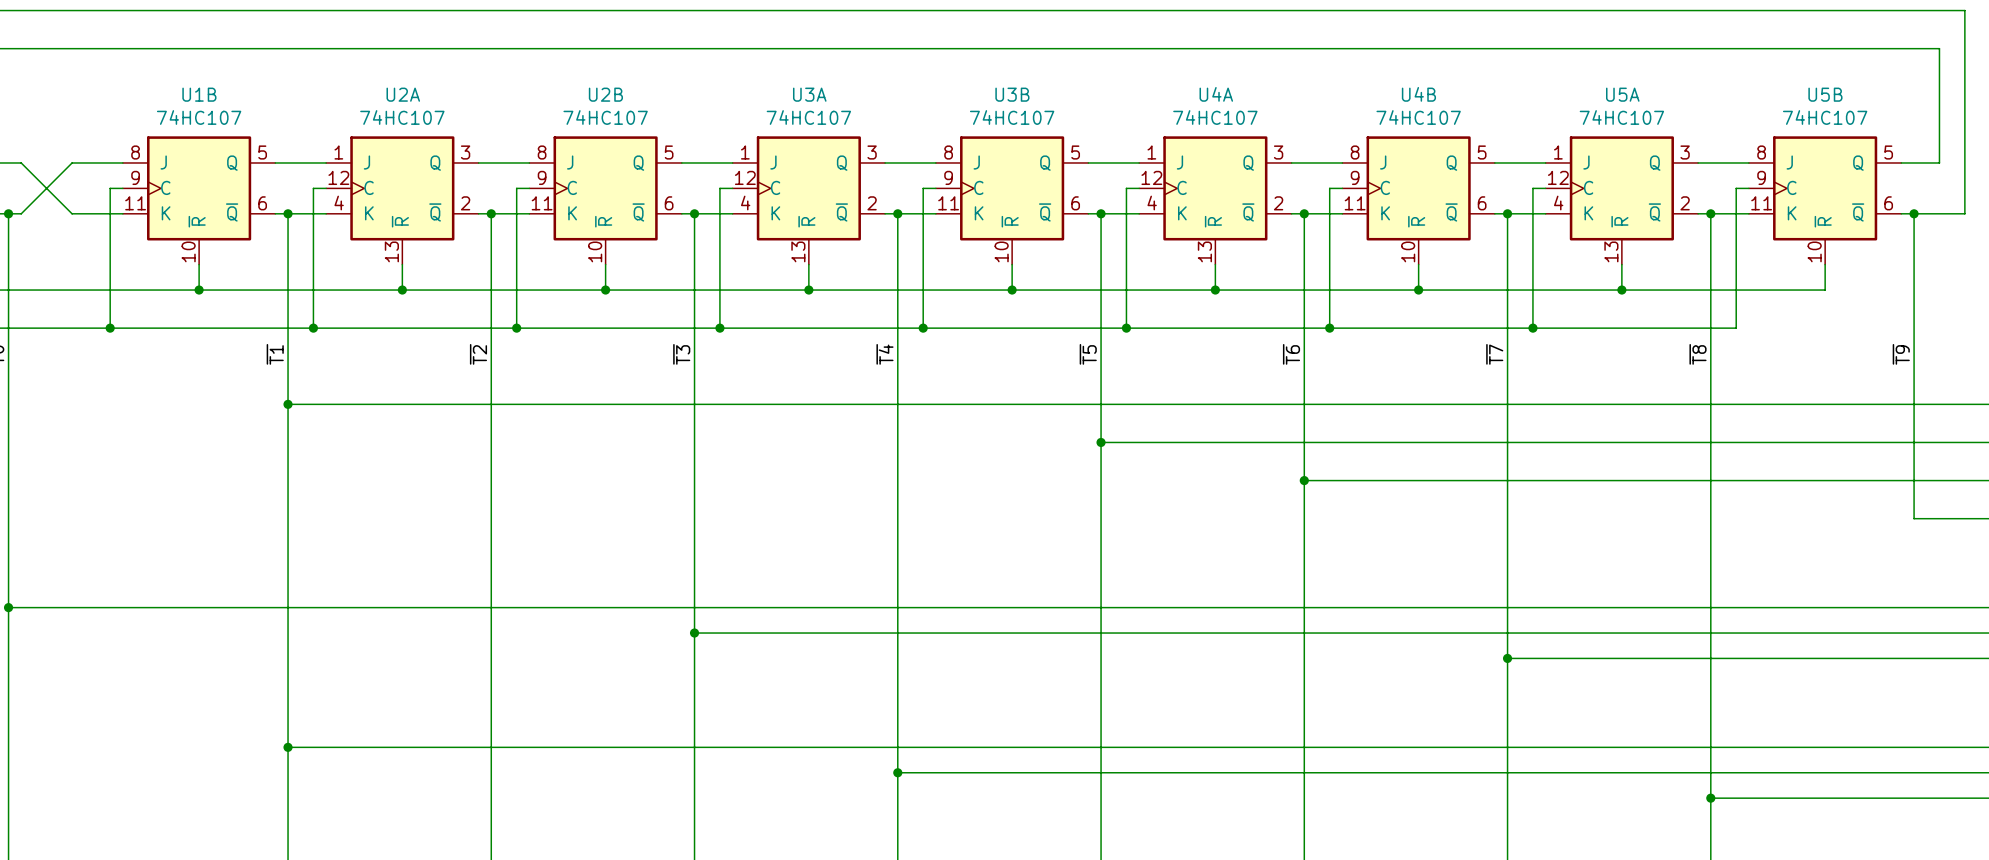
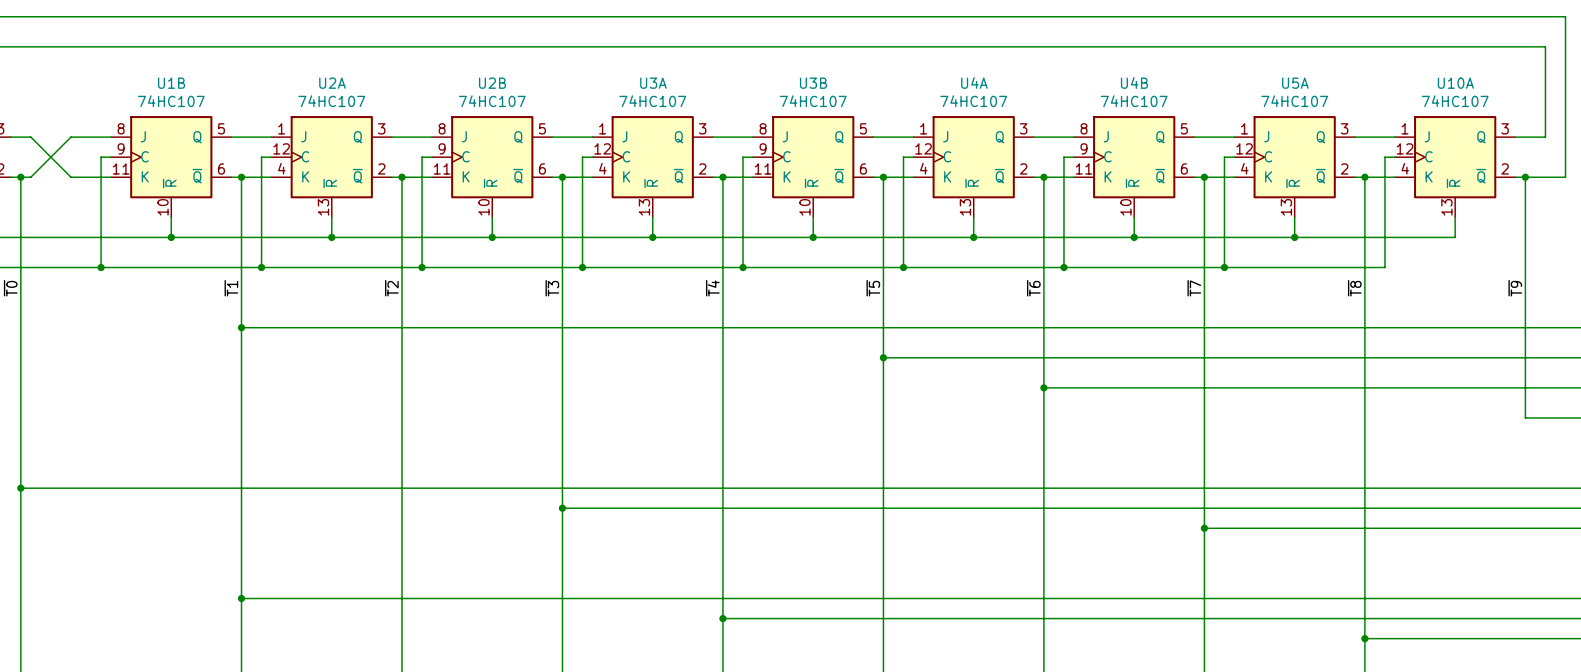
U5B name: U5B (1825, 94) -> U10A (1455, 83)
U5B pin number: 8 (1761, 152) -> 1 (1405, 128)
U5B pin number: 5 (1888, 152) -> 3 (1505, 128)
U5B pin number: 9 (1761, 177) -> 12 (1405, 148)
U5B pin number: 11 (1761, 203) -> 4 (1405, 168)
U5B pin number: 6 (1888, 203) -> 2 (1505, 168)
U5B pin number: 10 (1814, 251) -> 13 (1446, 207)

